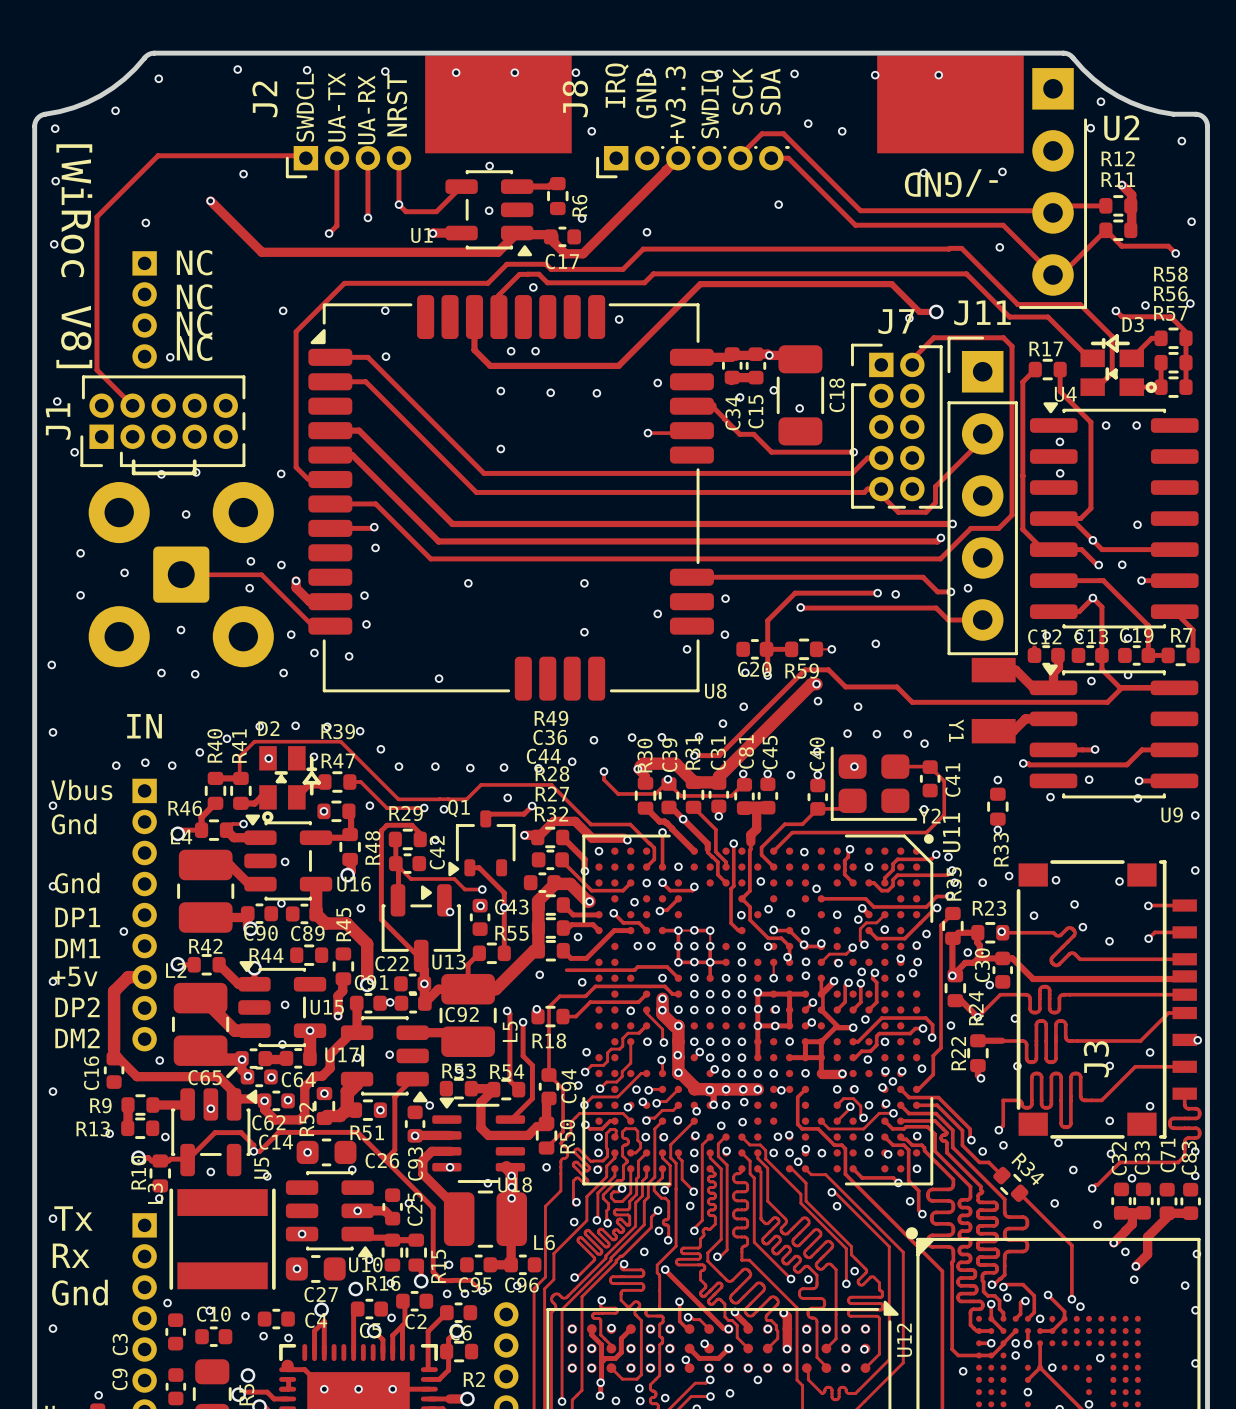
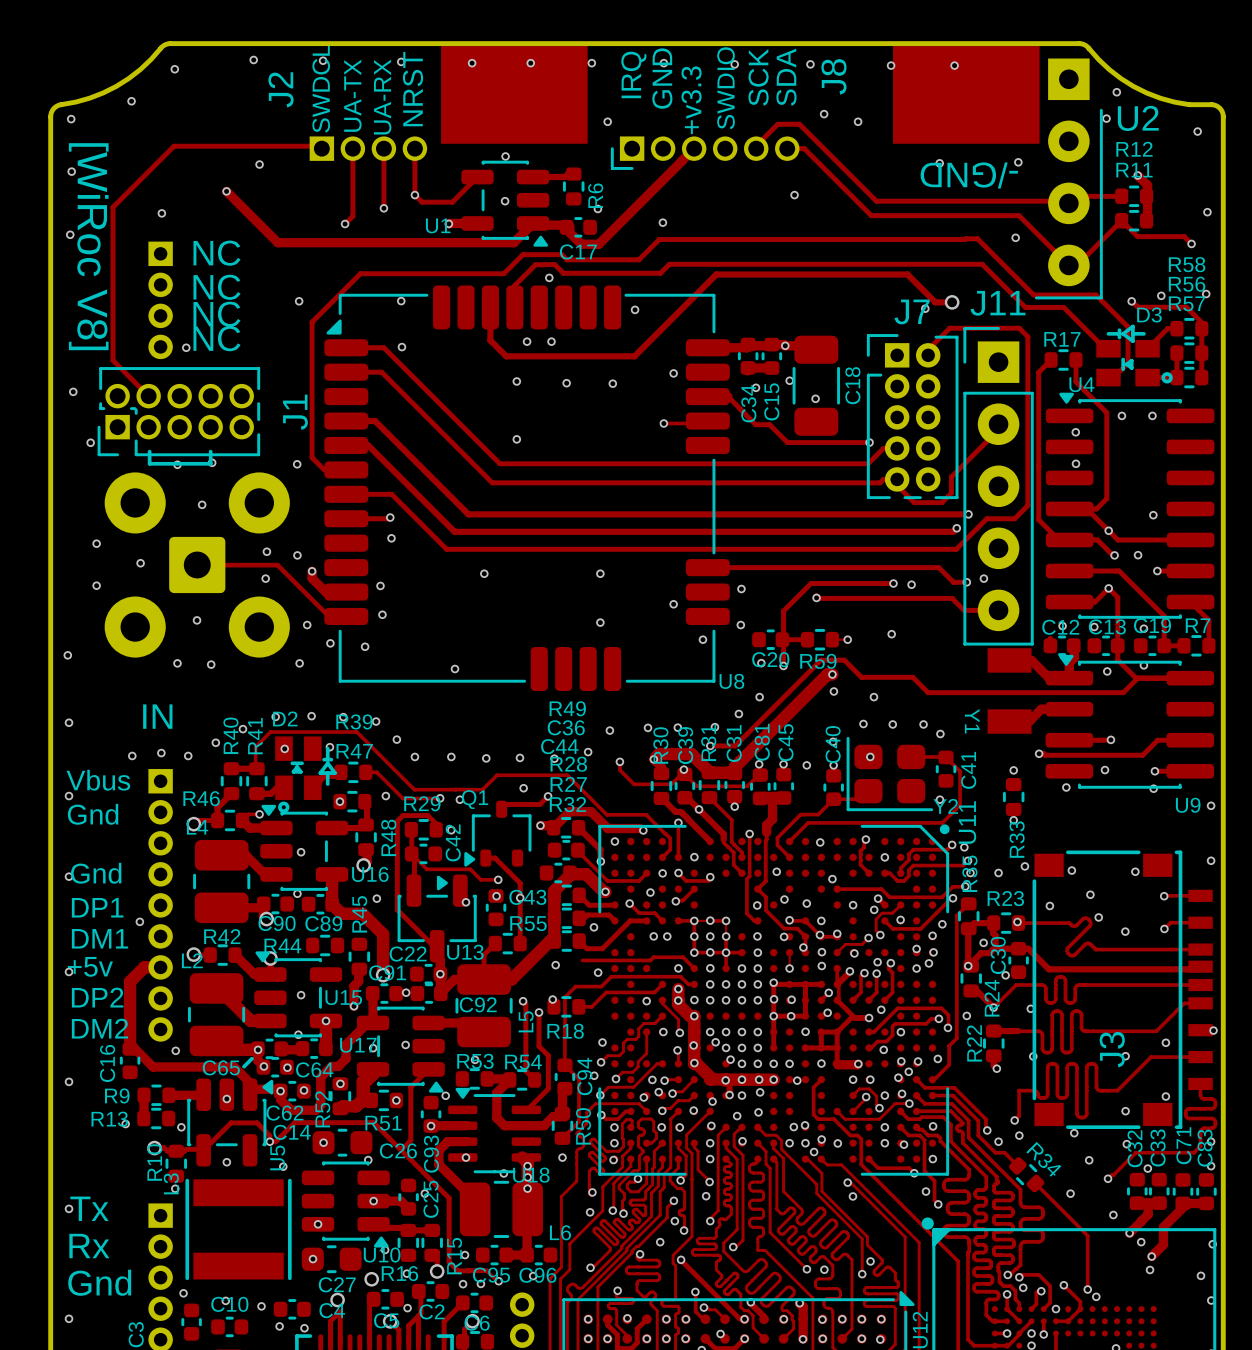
J8 name position: J8 (575, 98) -> J8 (833, 76)
J2 footprint: [285, 145, 412, 179] -> [309, 136, 428, 161]
J8 footprint: [596, 145, 790, 179] -> [610, 136, 800, 170]
J1 footprint: [80, 375, 246, 468] -> [97, 367, 261, 457]
J1 name position: J1 (58, 421) -> J1 (295, 412)

